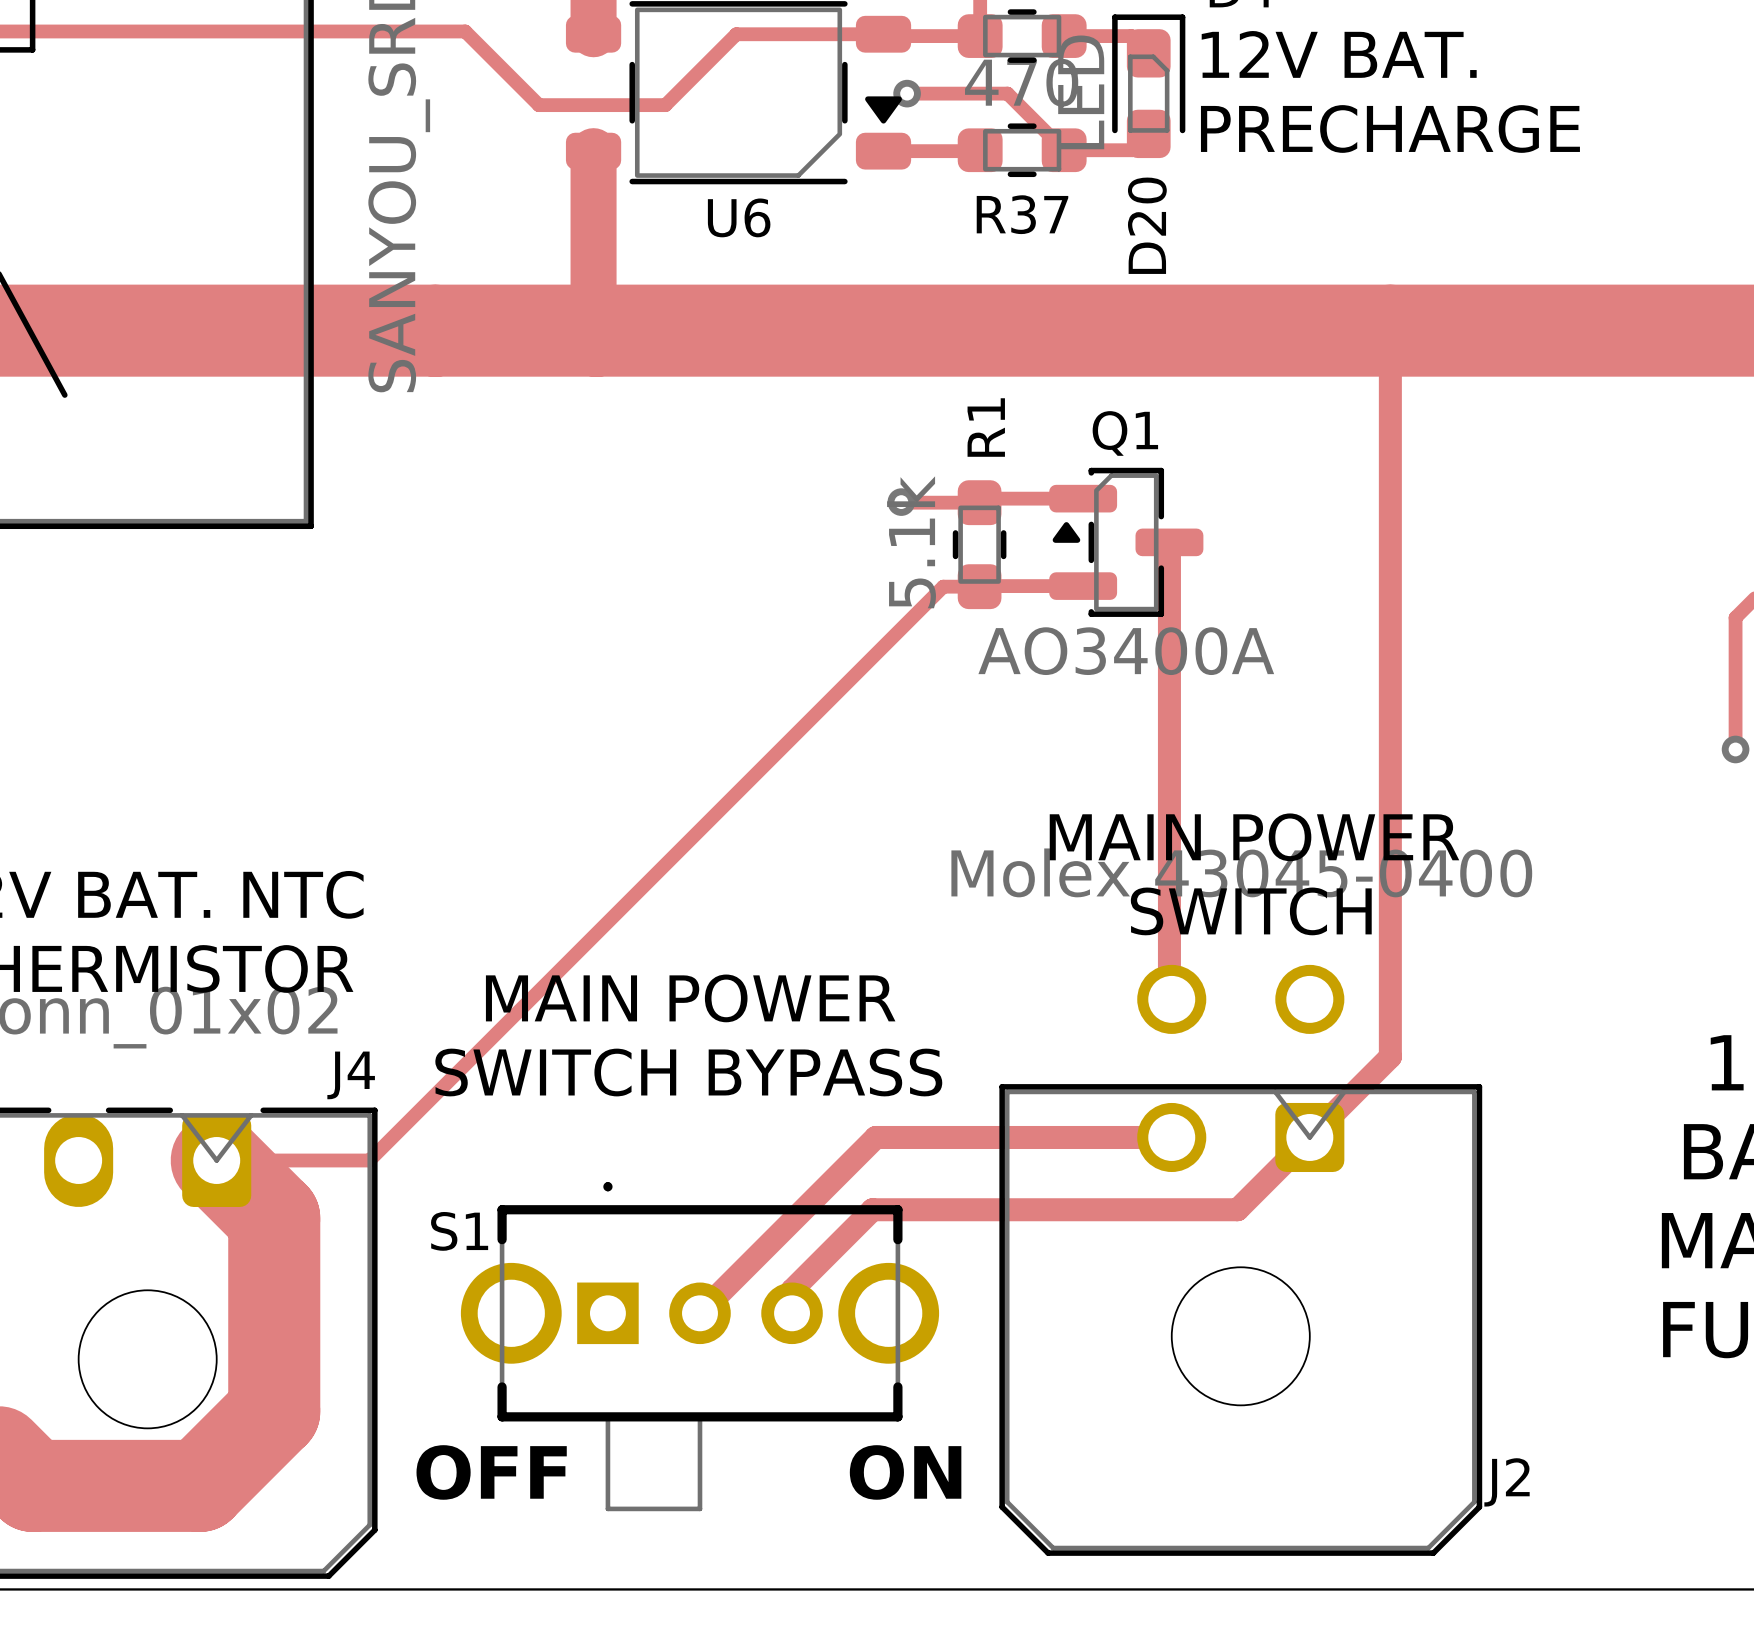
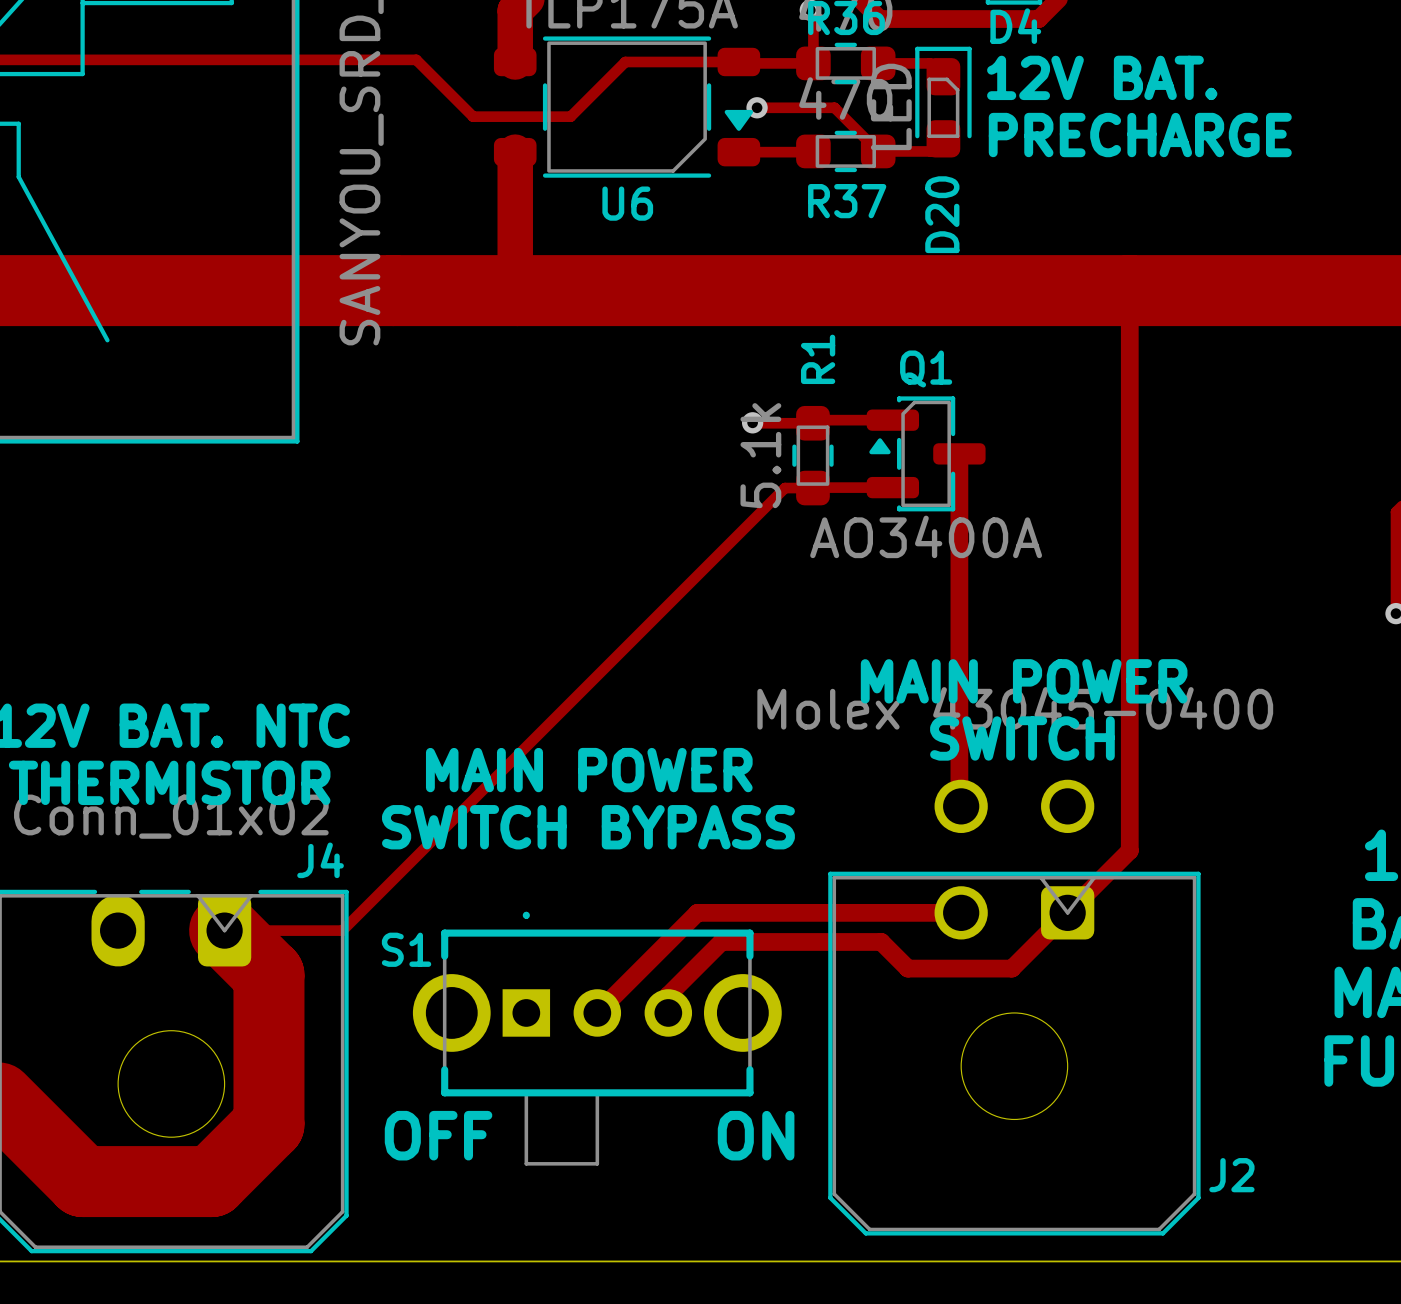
text position: MAIN POWER (690, 998) -> MAIN POWER (589, 770)
text position: SWITCH BYPASS (688, 1072) -> SWITCH BYPASS (588, 827)
track: (875, 1137) (699, 1313) -> (732, 912) (697, 912) (597, 1012)
track: (1102, 1209) (872, 1209) (792, 1290) (792, 1313) -> (907, 968) (881, 941) (721, 941) (668, 995) (668, 1012)
S1 position: (699, 1346) -> (597, 1038)
text position: OFF (491, 1472) -> OFF (438, 1135)
text position: ON (905, 1472) -> ON (756, 1135)

